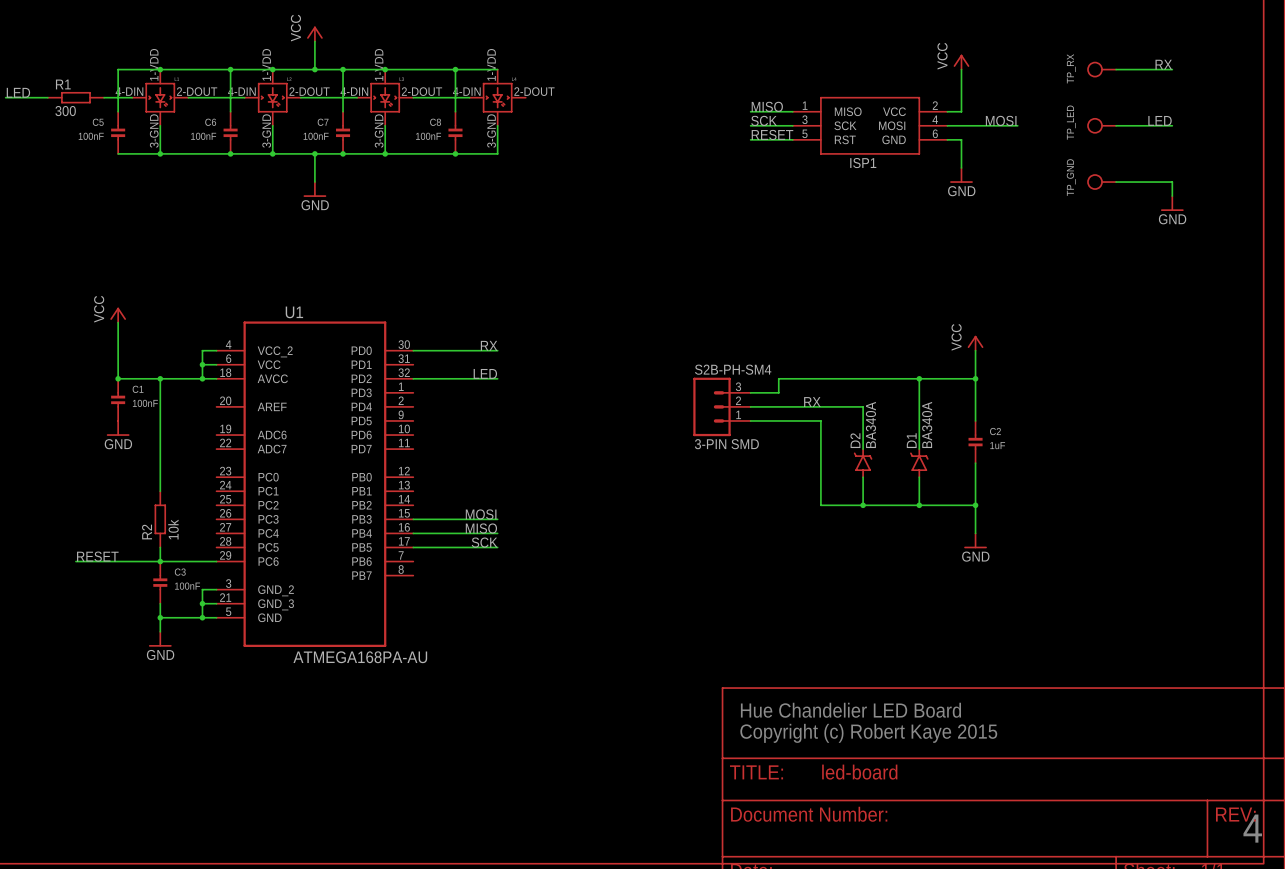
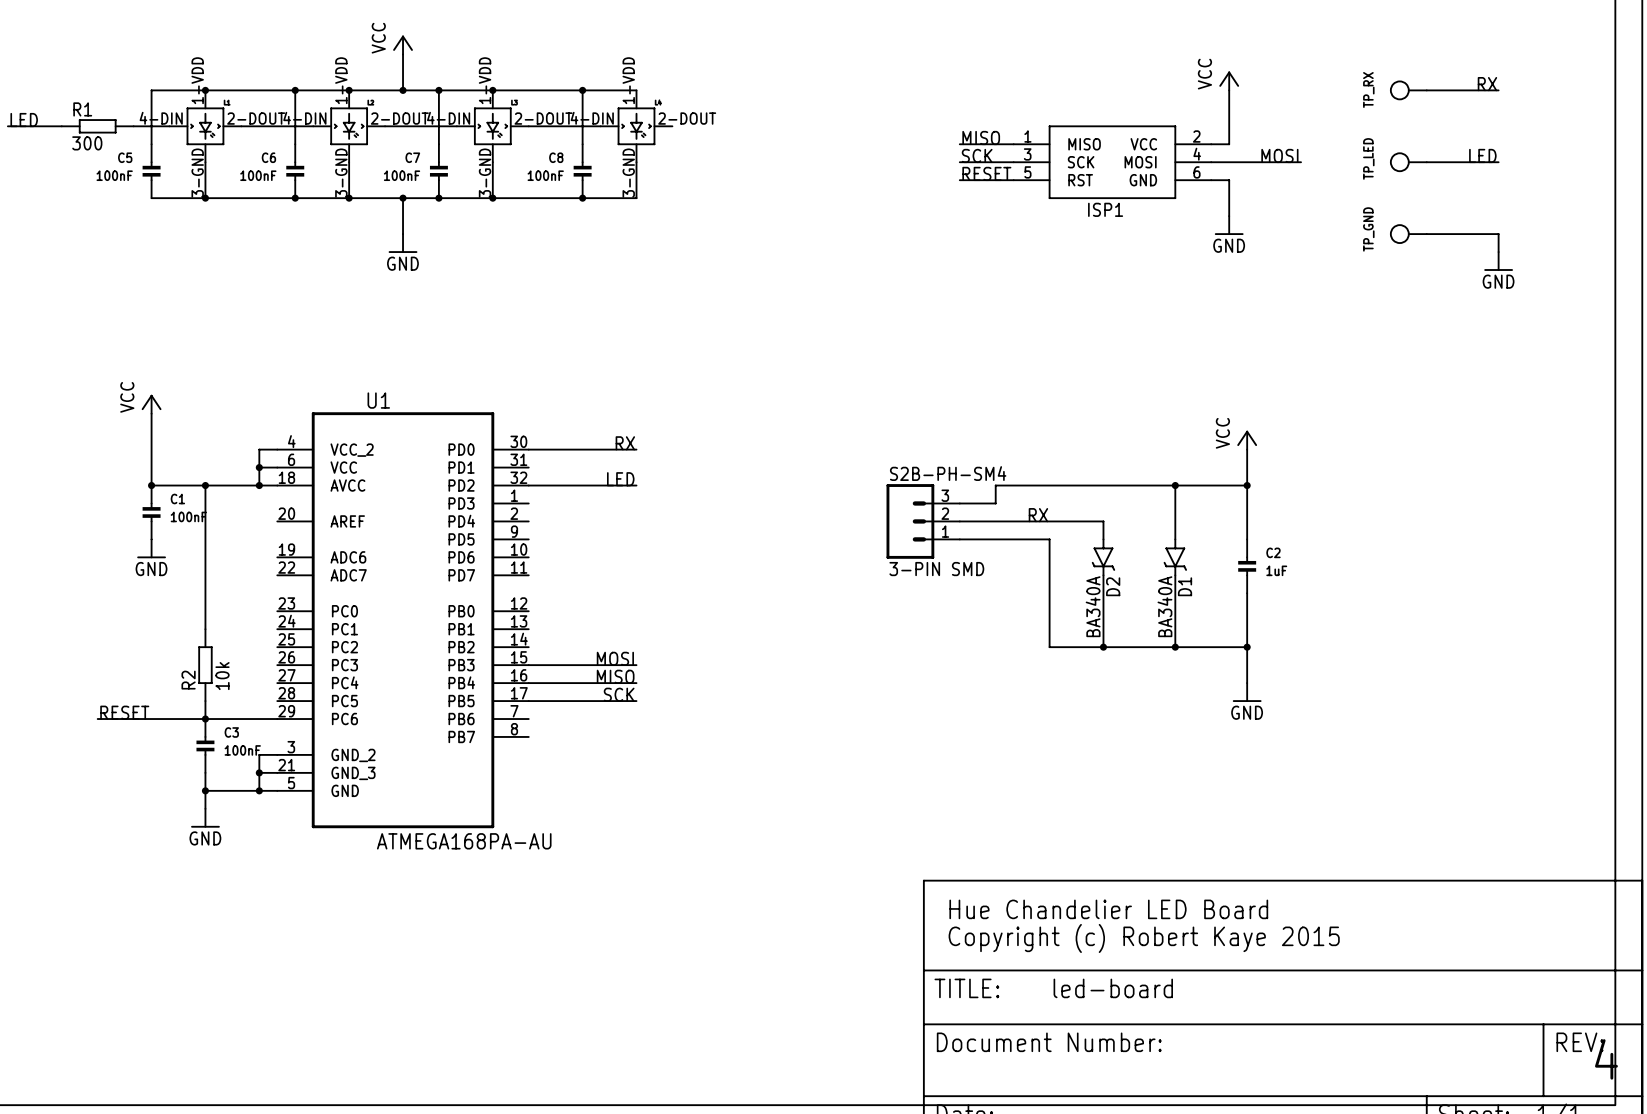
D2 rotation: 0° (863, 463) -> 180° (1103, 557)
D2 position: (863, 463) -> (1103, 557)
D1 rotation: 0° (919, 463) -> 180° (1175, 557)
D1 position: (919, 463) -> (1175, 557)

